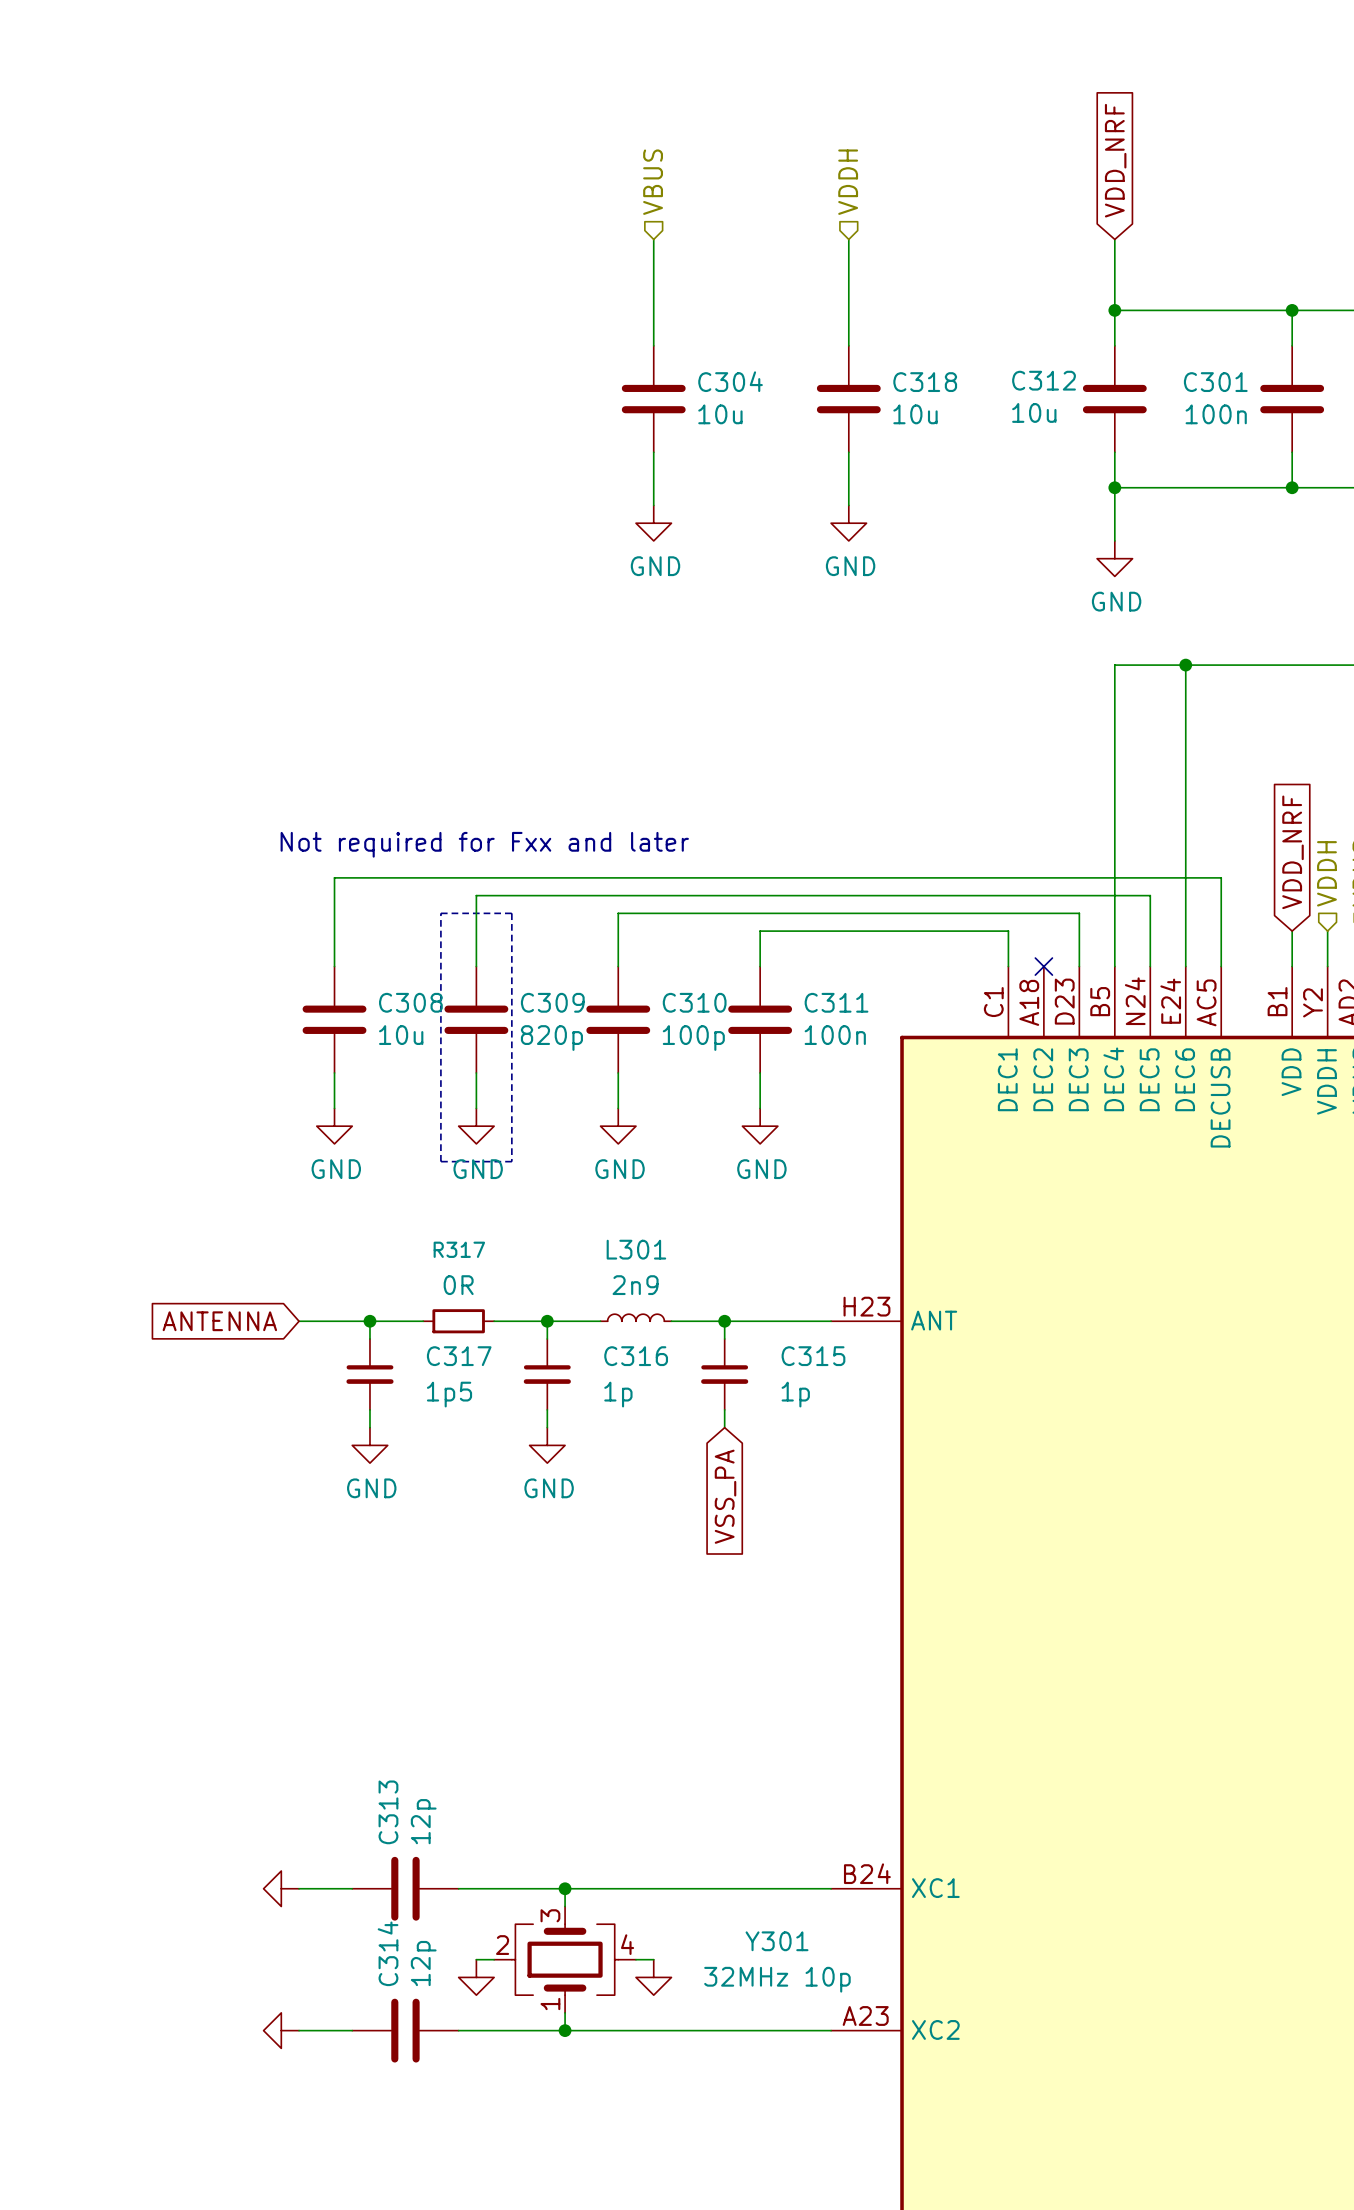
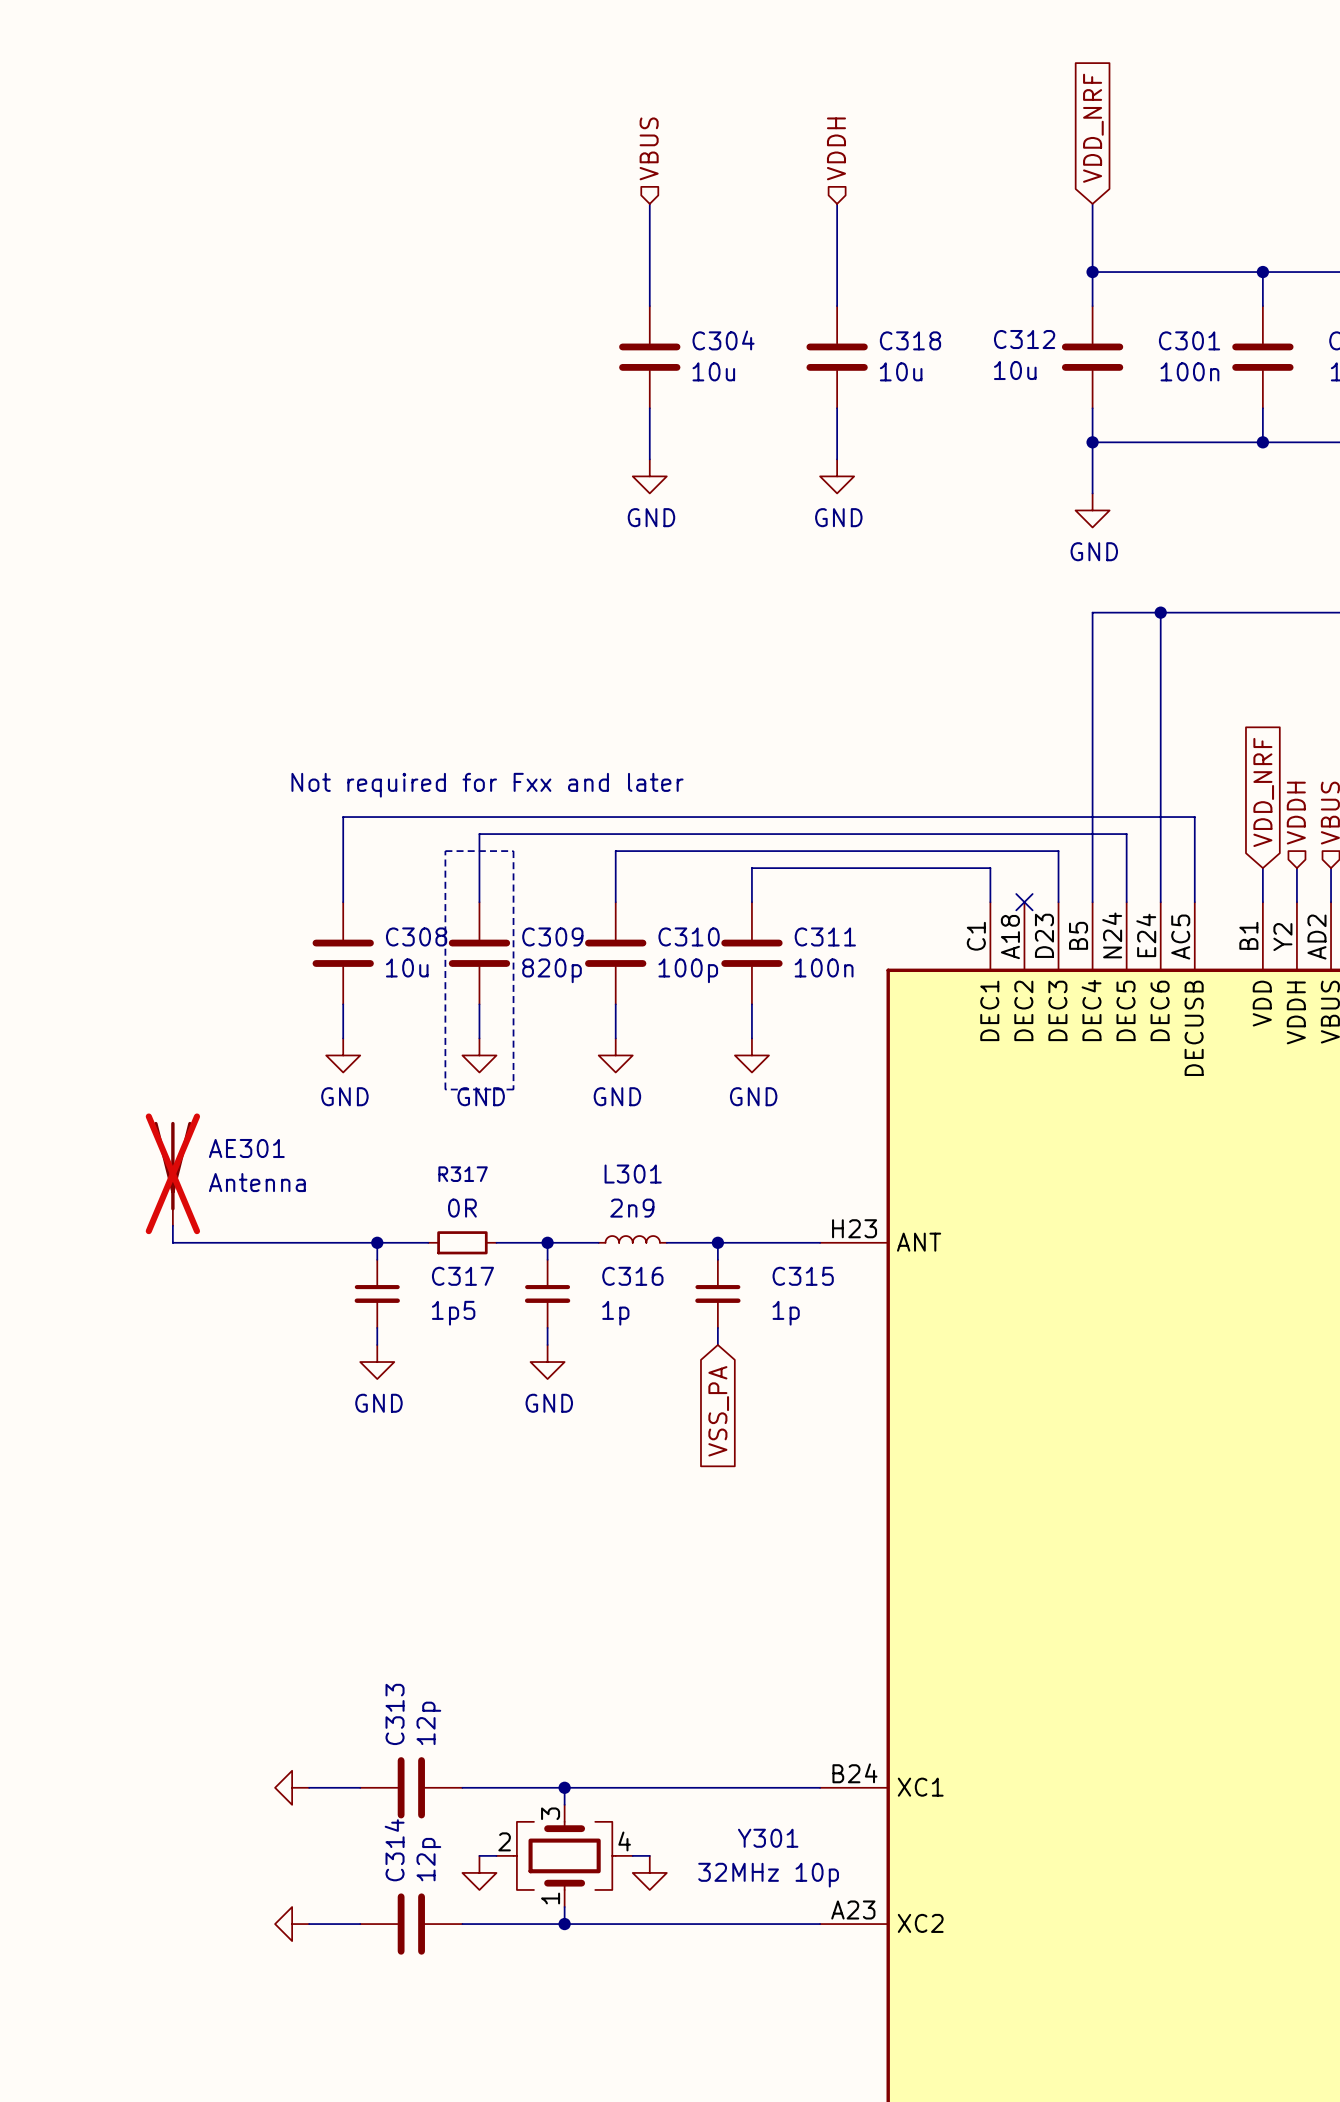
AE301: none -> Antenna (172, 1173)
wire: none -> (172, 1225) (172, 1242) (309, 1242)
global label: ANTENNA (219, 1321) -> none

